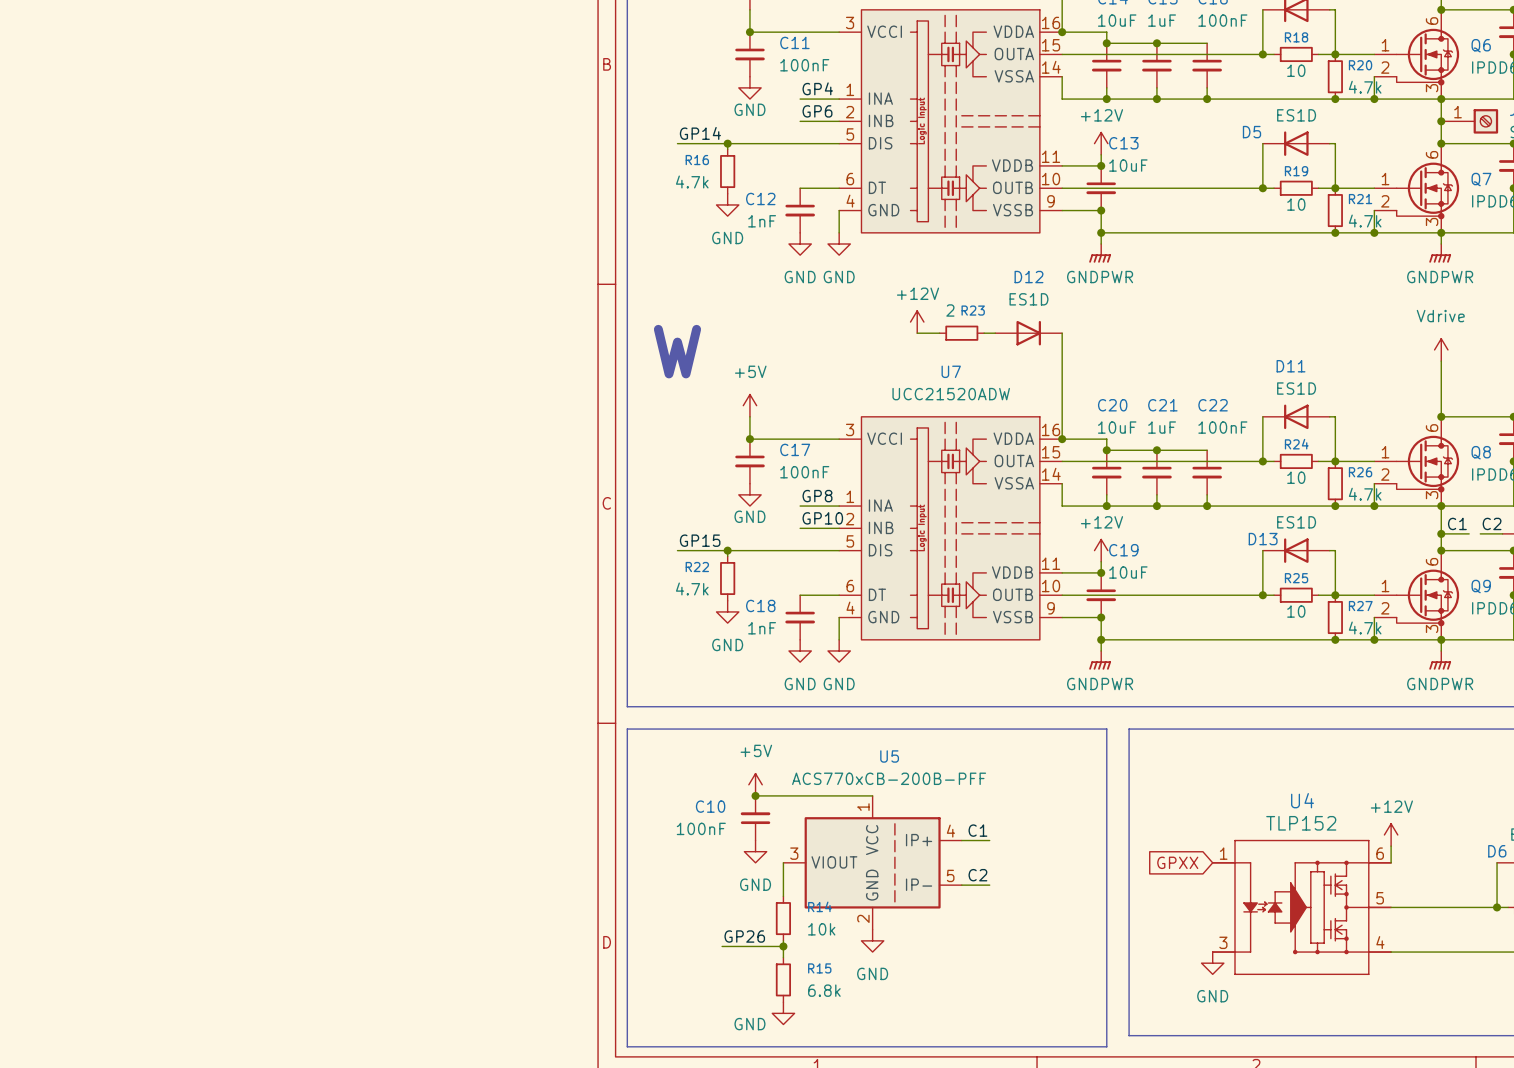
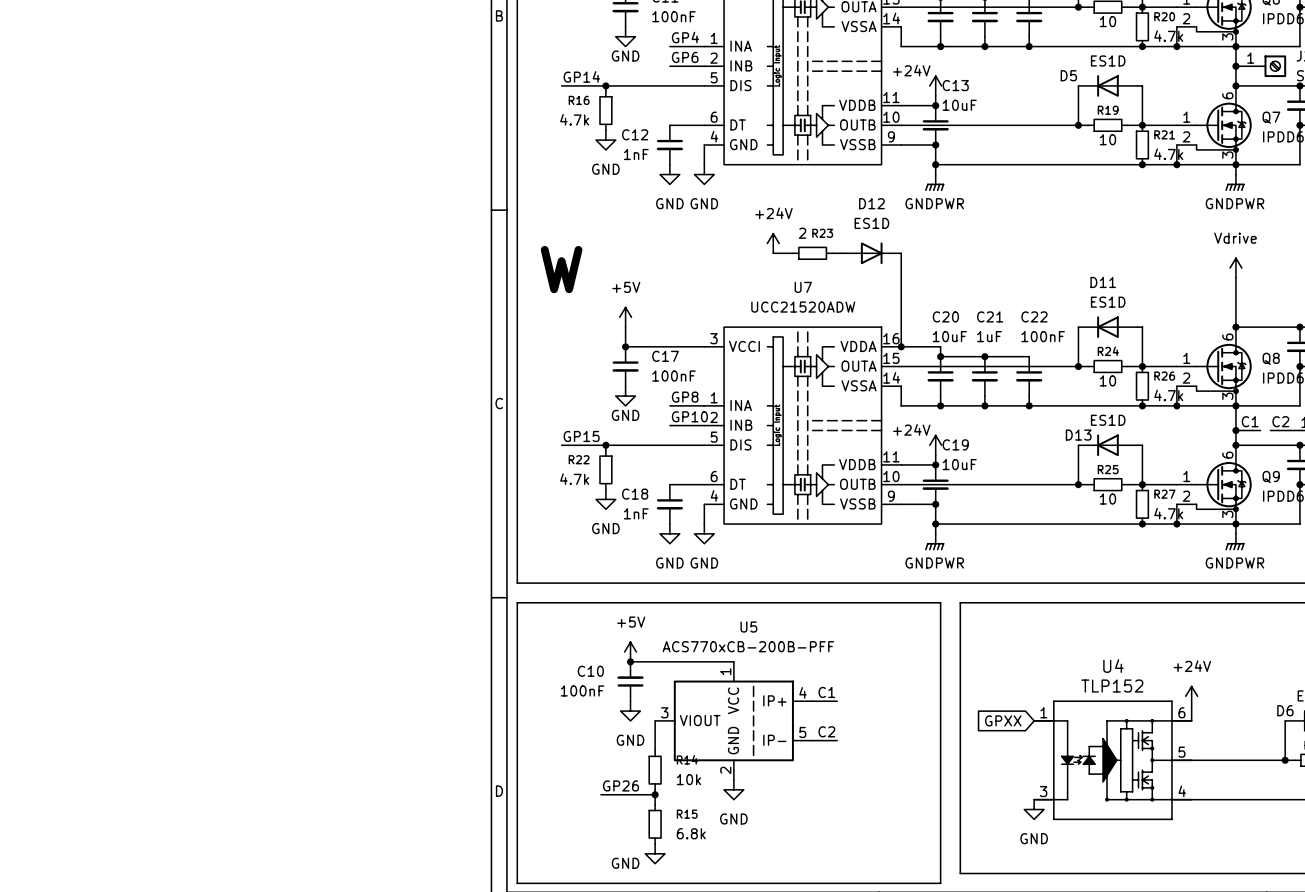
power symbol: +12V (1101, 143) -> +24V (935, 85)
power symbol: +12V (917, 322) -> +24V (773, 243)
power symbol: +12V (1101, 550) -> +24V (935, 445)
power symbol: +12V (1391, 834) -> +24V (1191, 696)

